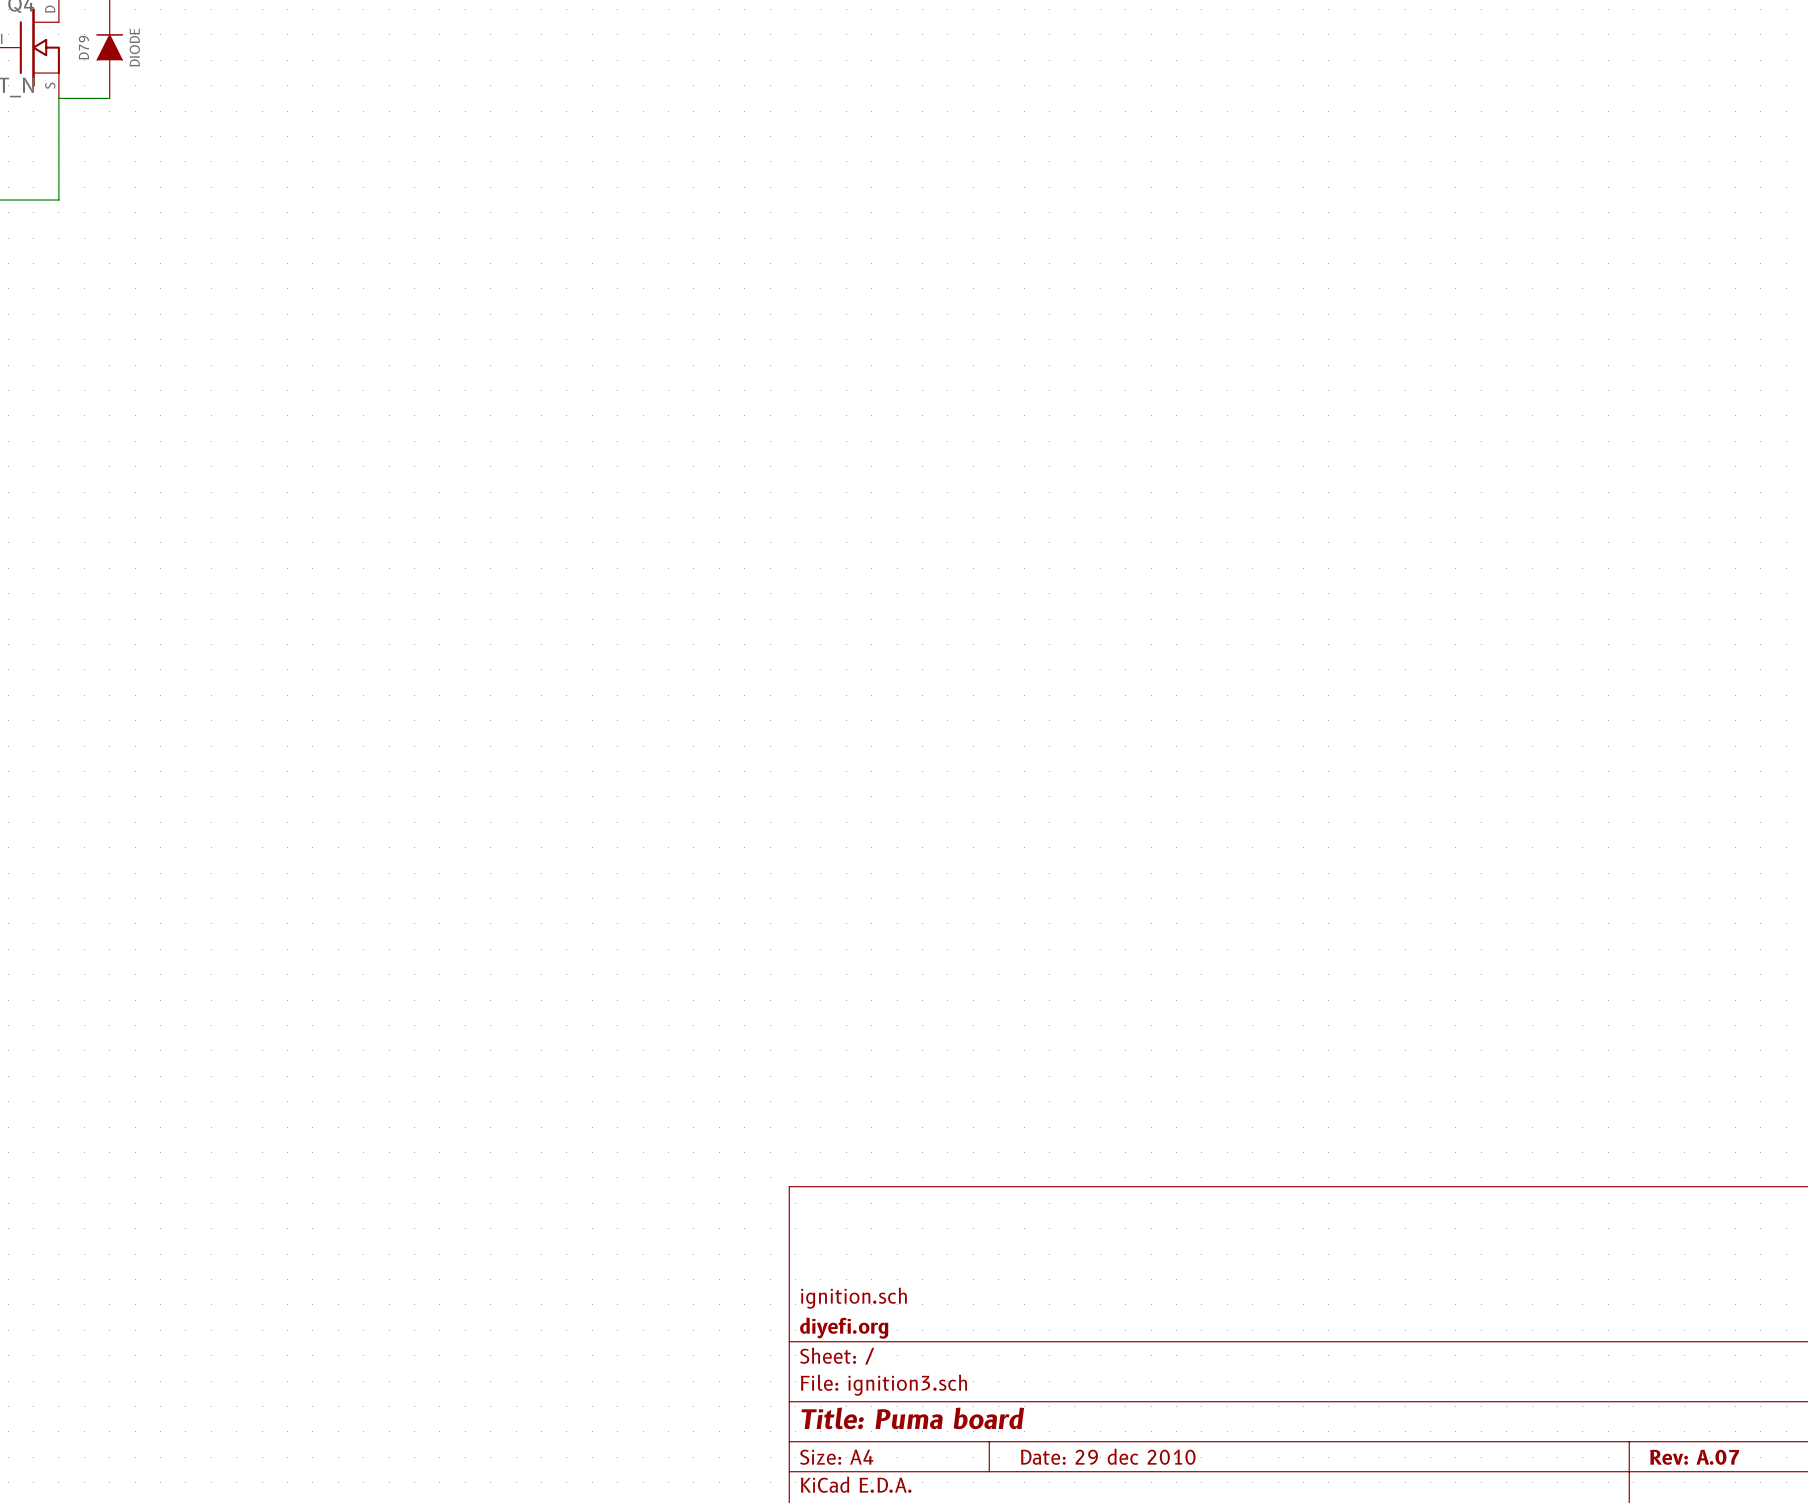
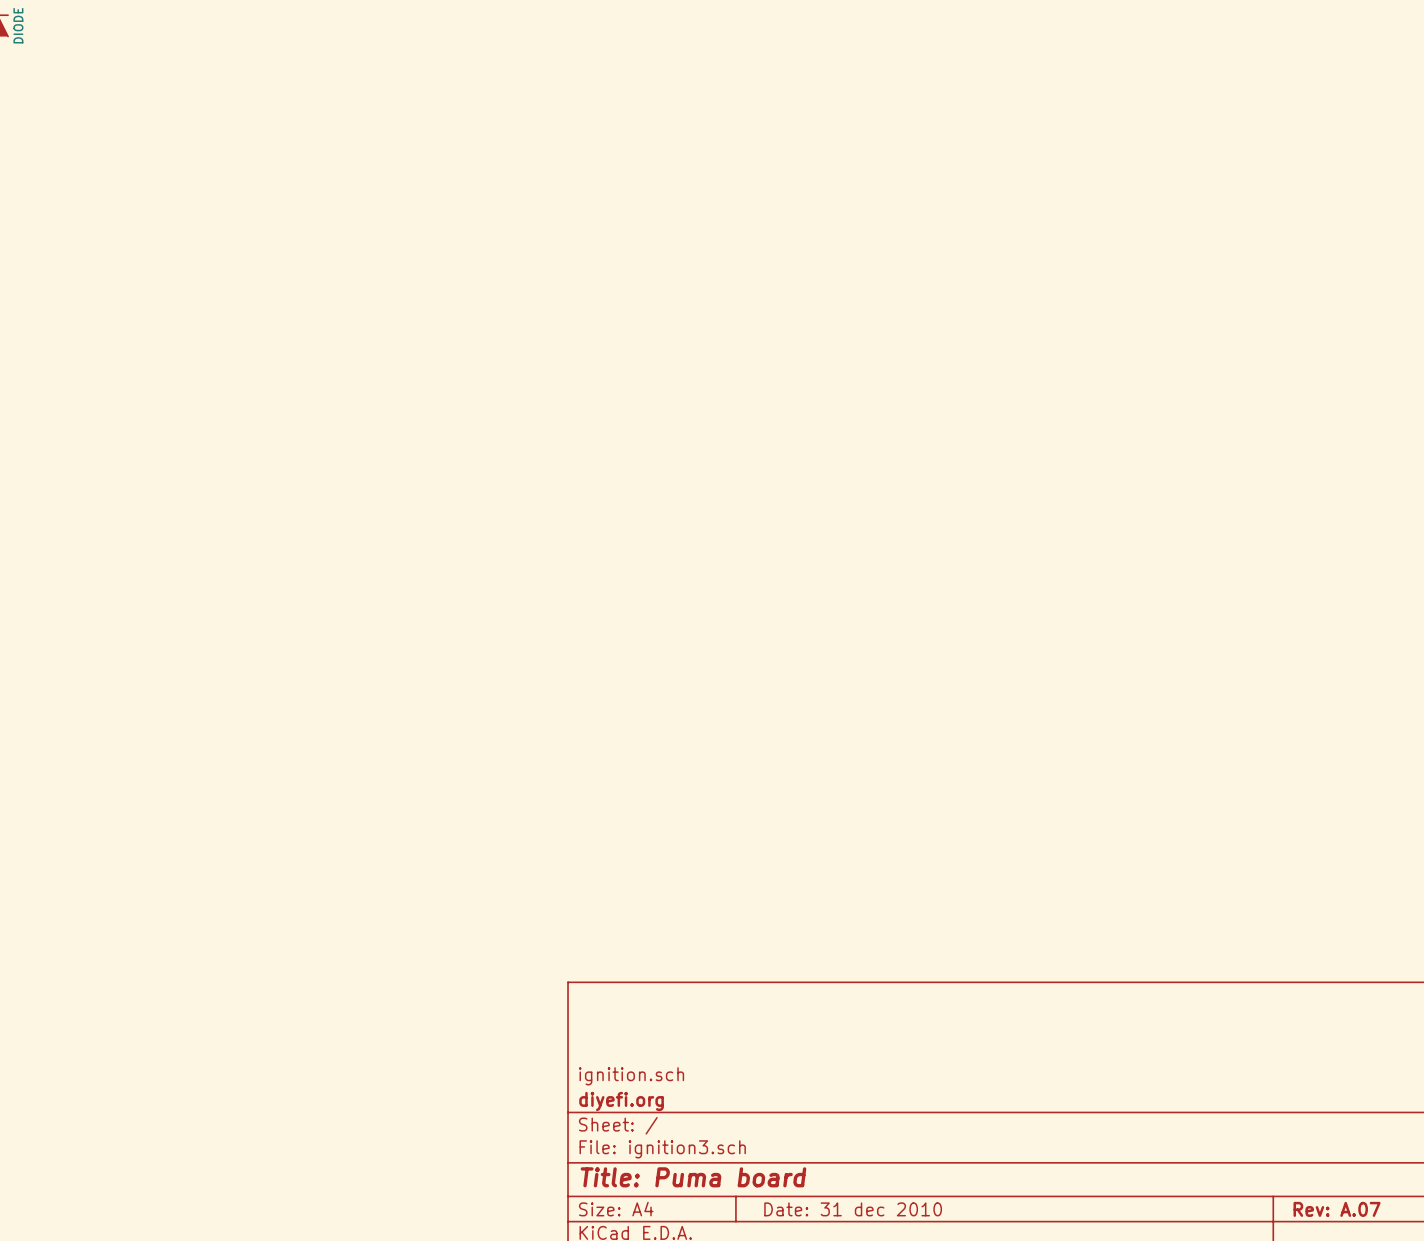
title block: Date: 29 dec 2010 (1108, 1456) -> Date: 31 dec 2010 (853, 1209)

